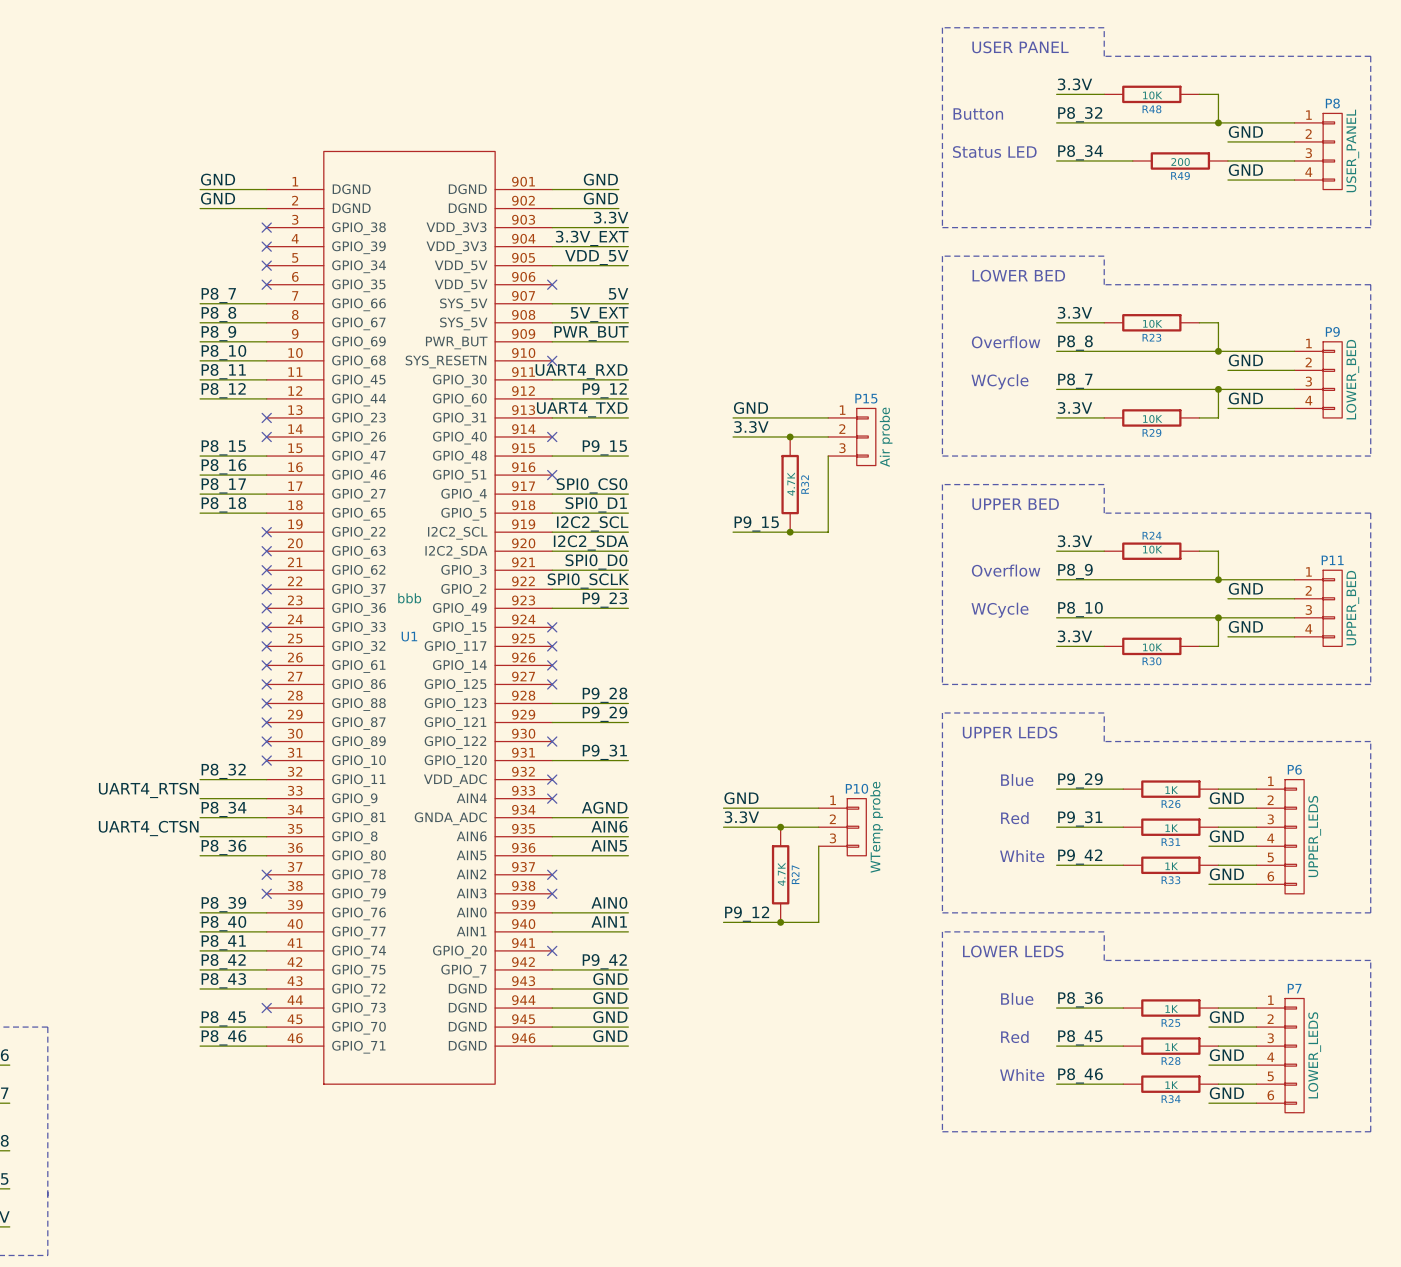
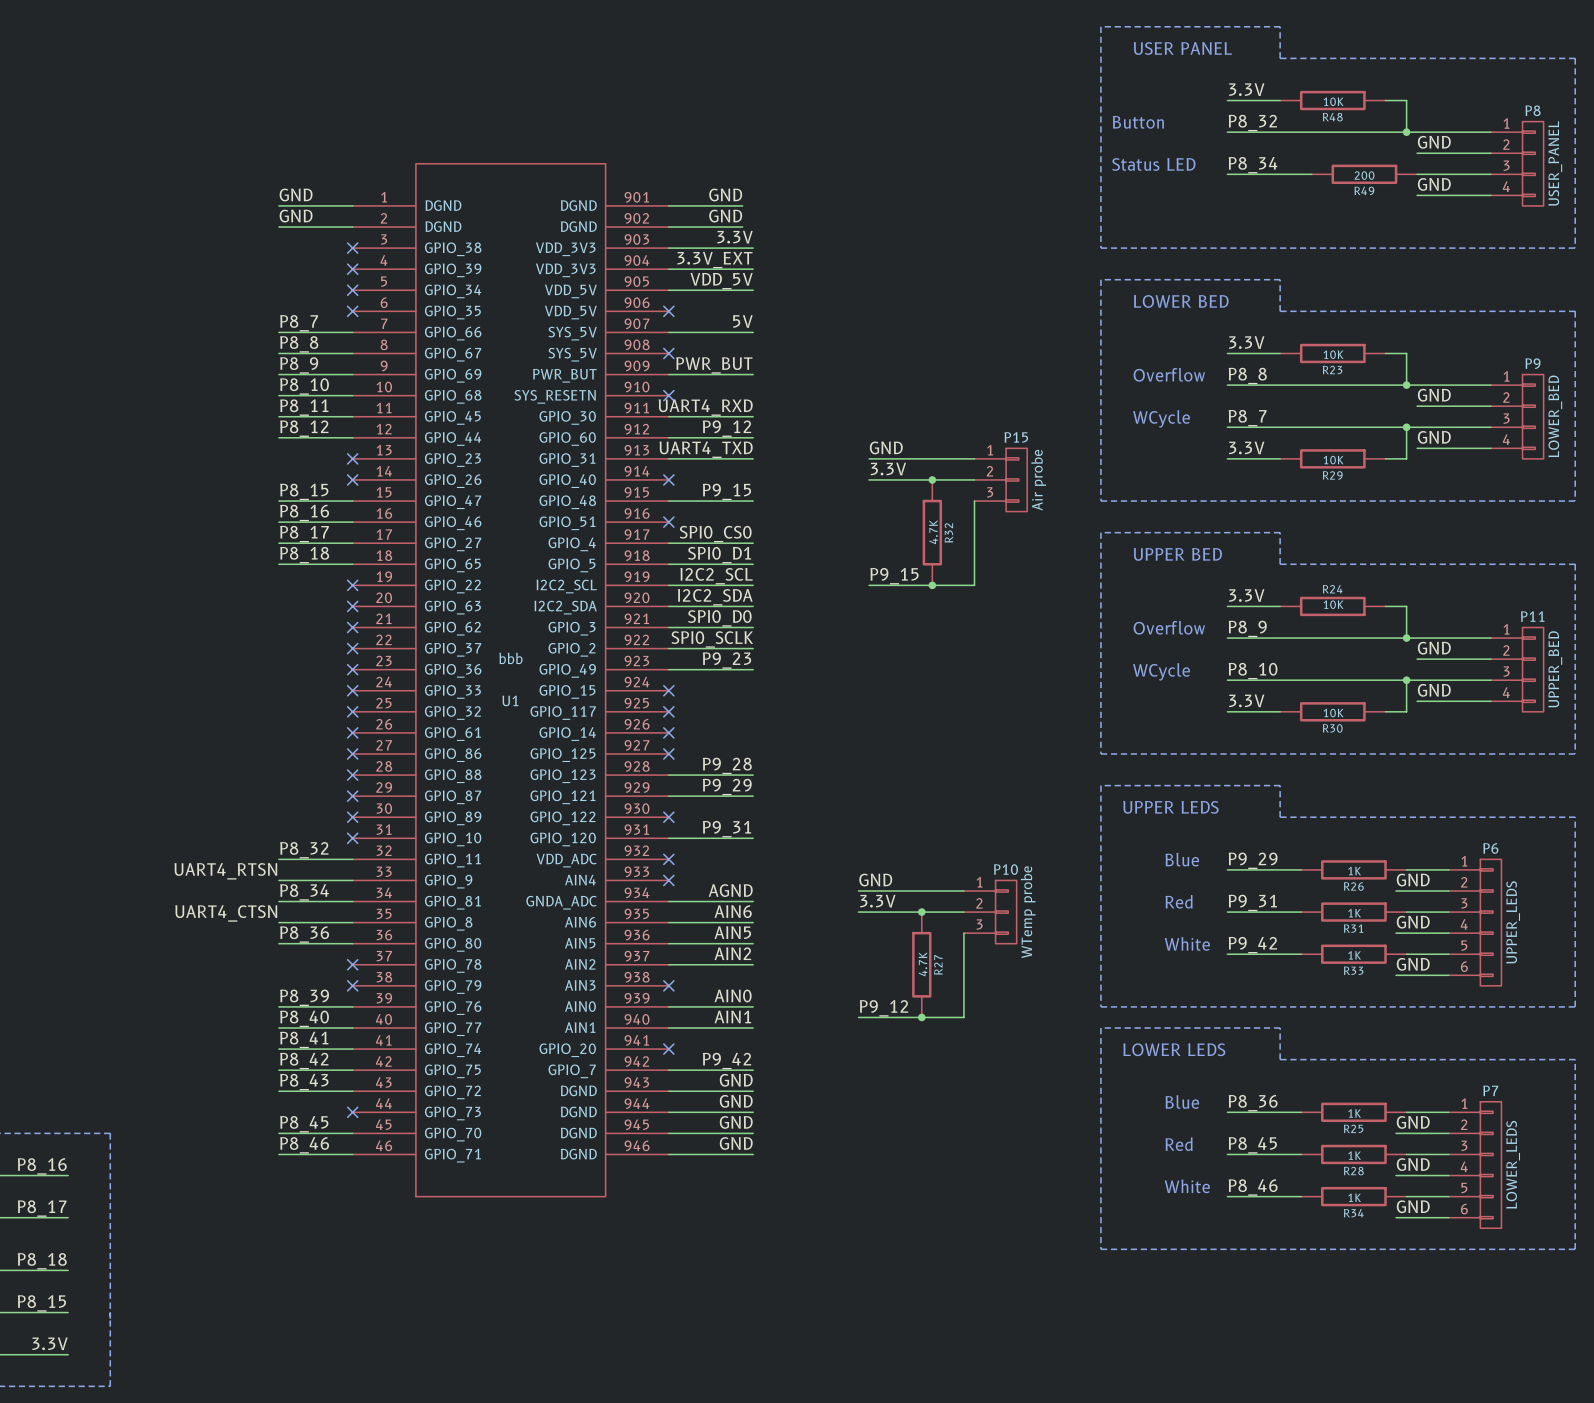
label: 5V_EXT (599, 314) -> none
wire: (552, 322) (628, 322) -> none
no-connect mark: none -> (668, 353)
label: none -> AIN2 (732, 953)
wire: none -> (668, 964) (753, 964)
no-connect mark: (552, 874) -> none

